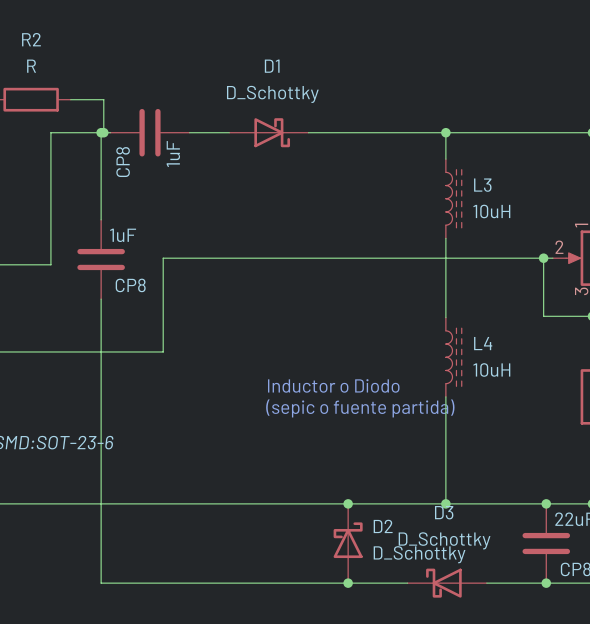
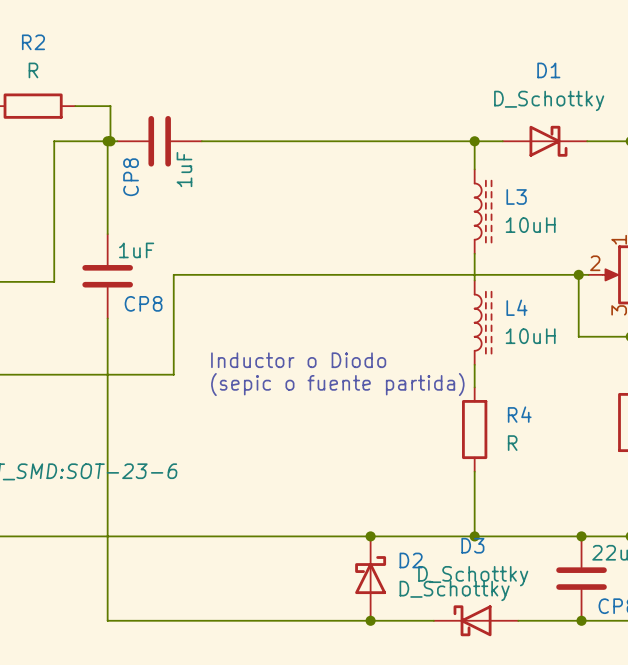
D1 position: (268, 132) -> (544, 141)
wire: (445, 263) (445, 317) -> none
wire: none -> (474, 364) (474, 387)
L4 position: (453, 357) -> (483, 322)
text position: Inductor o Diodo (333, 385) -> Inductor o Diodo (298, 360)
wire: (445, 396) (445, 443) -> none
R4: none -> R (474, 429)
text position: (sepic o fuente partida) (360, 408) -> (sepic o fuente partida) (337, 384)

